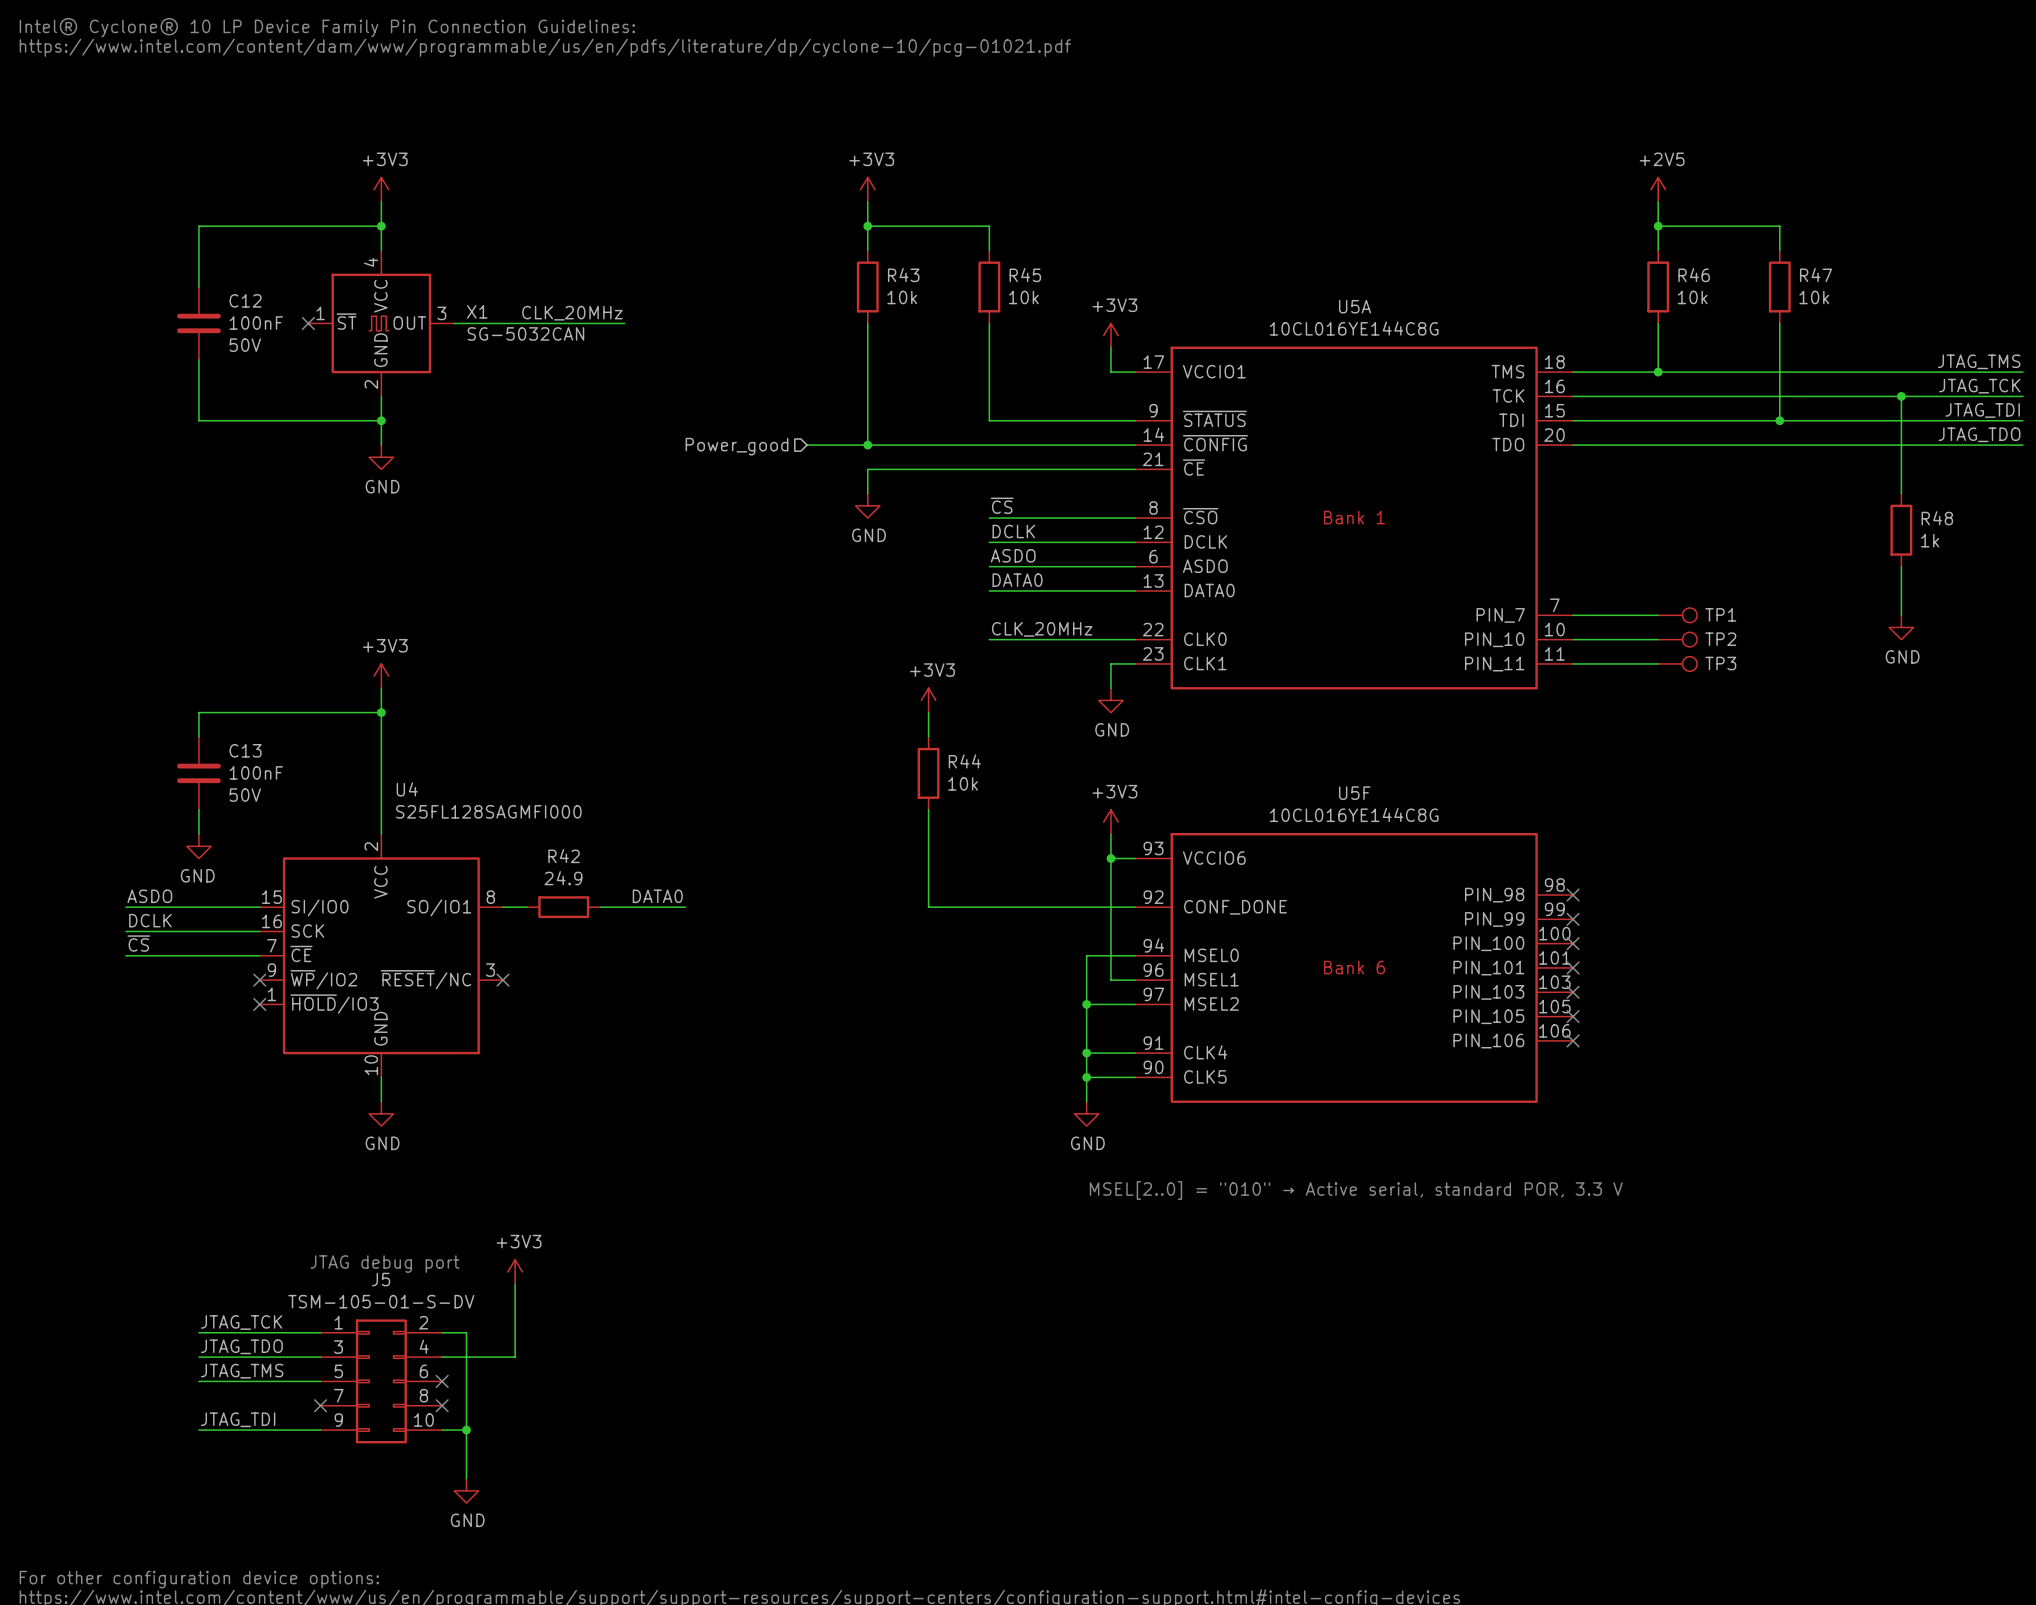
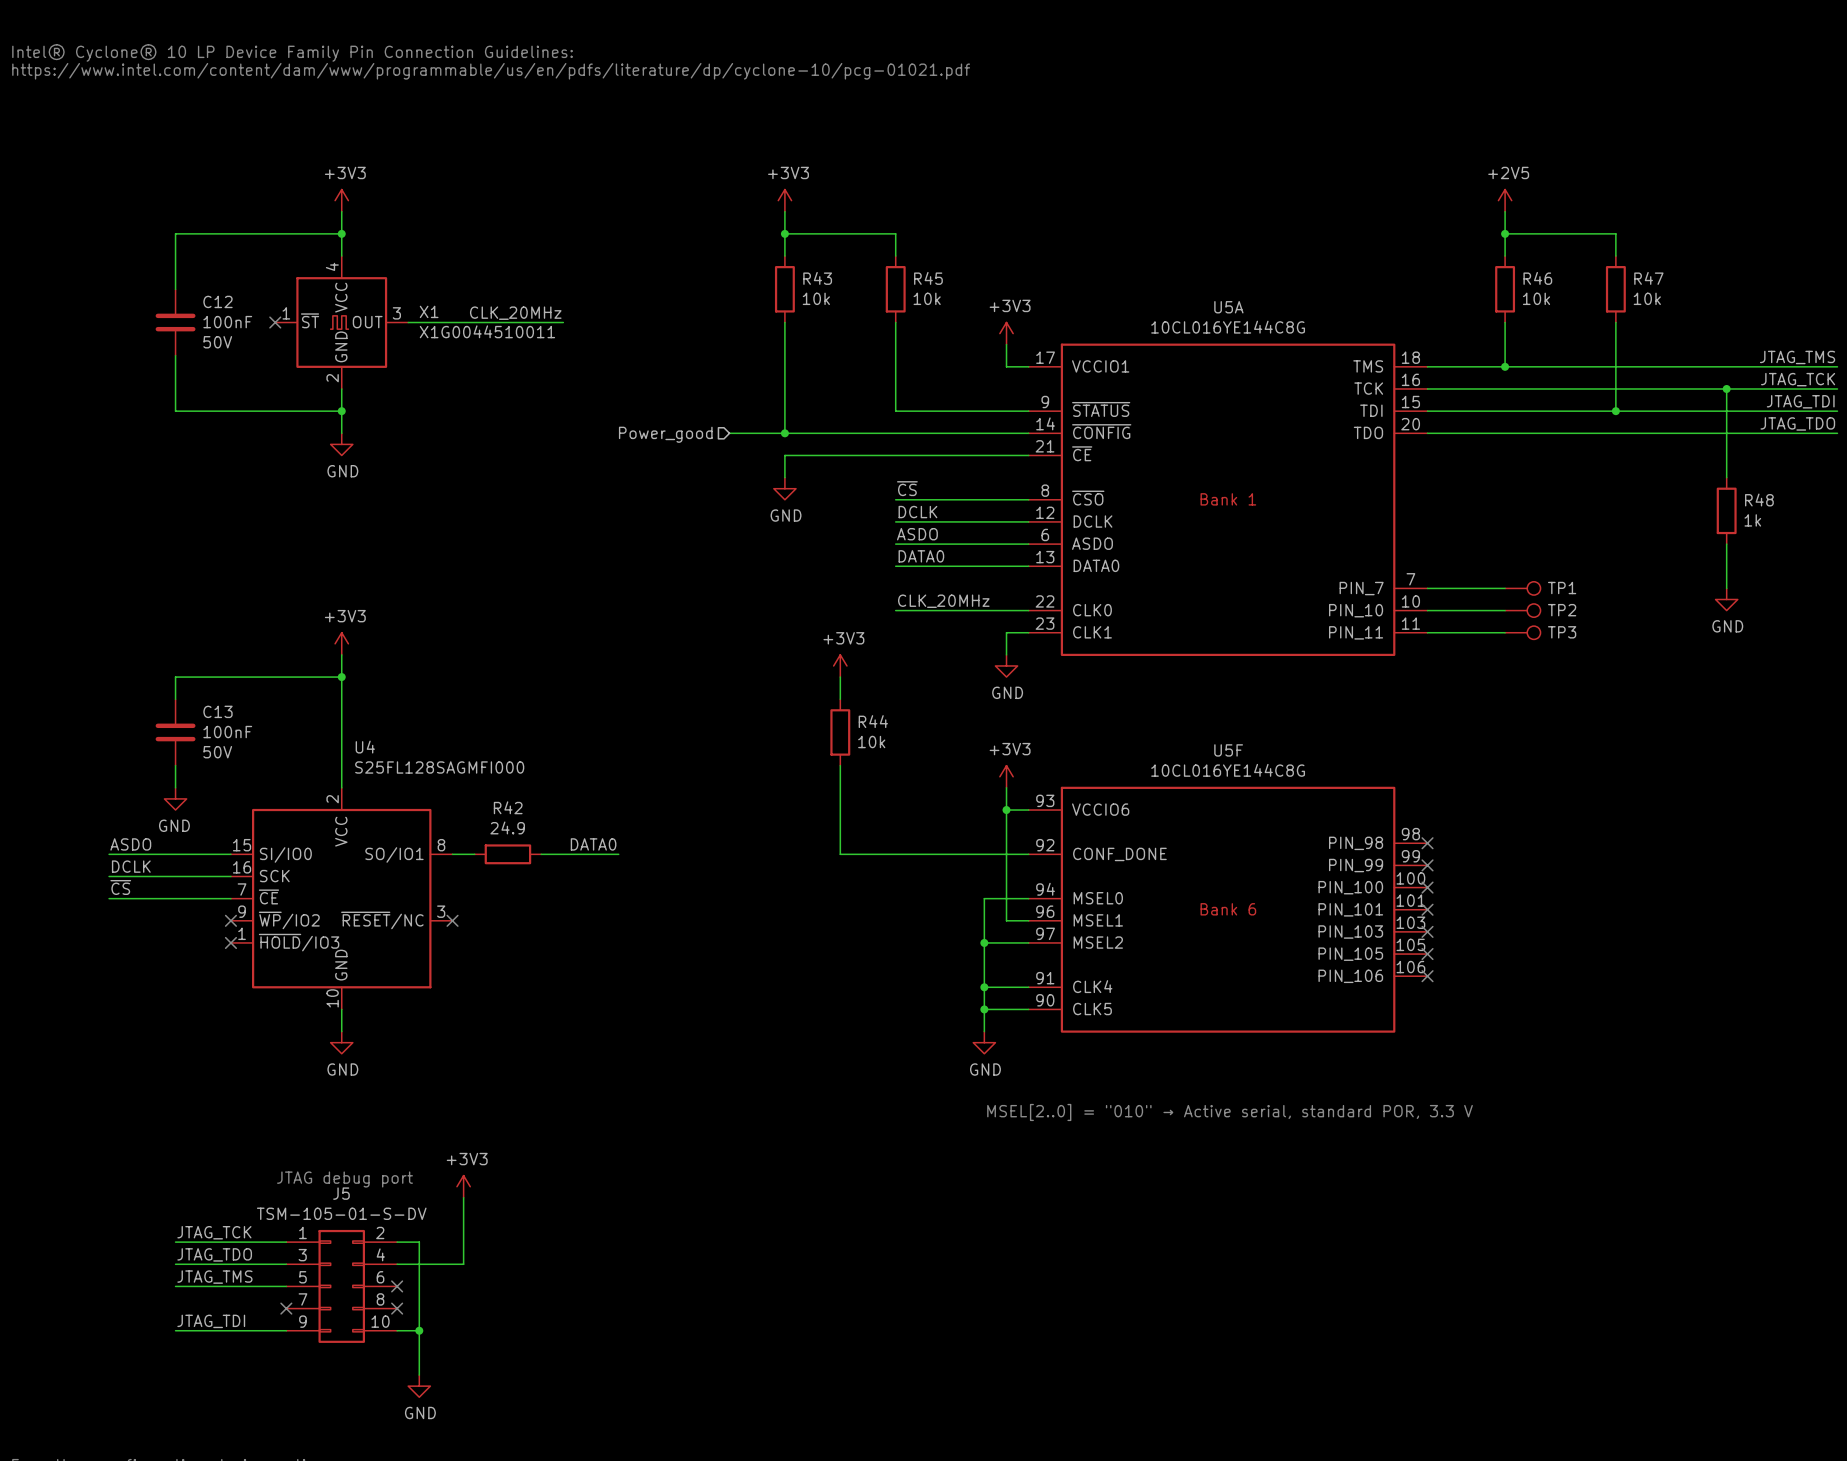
X1 value: SG-5032CAN (525, 333) -> X1G0044510011 (487, 331)

